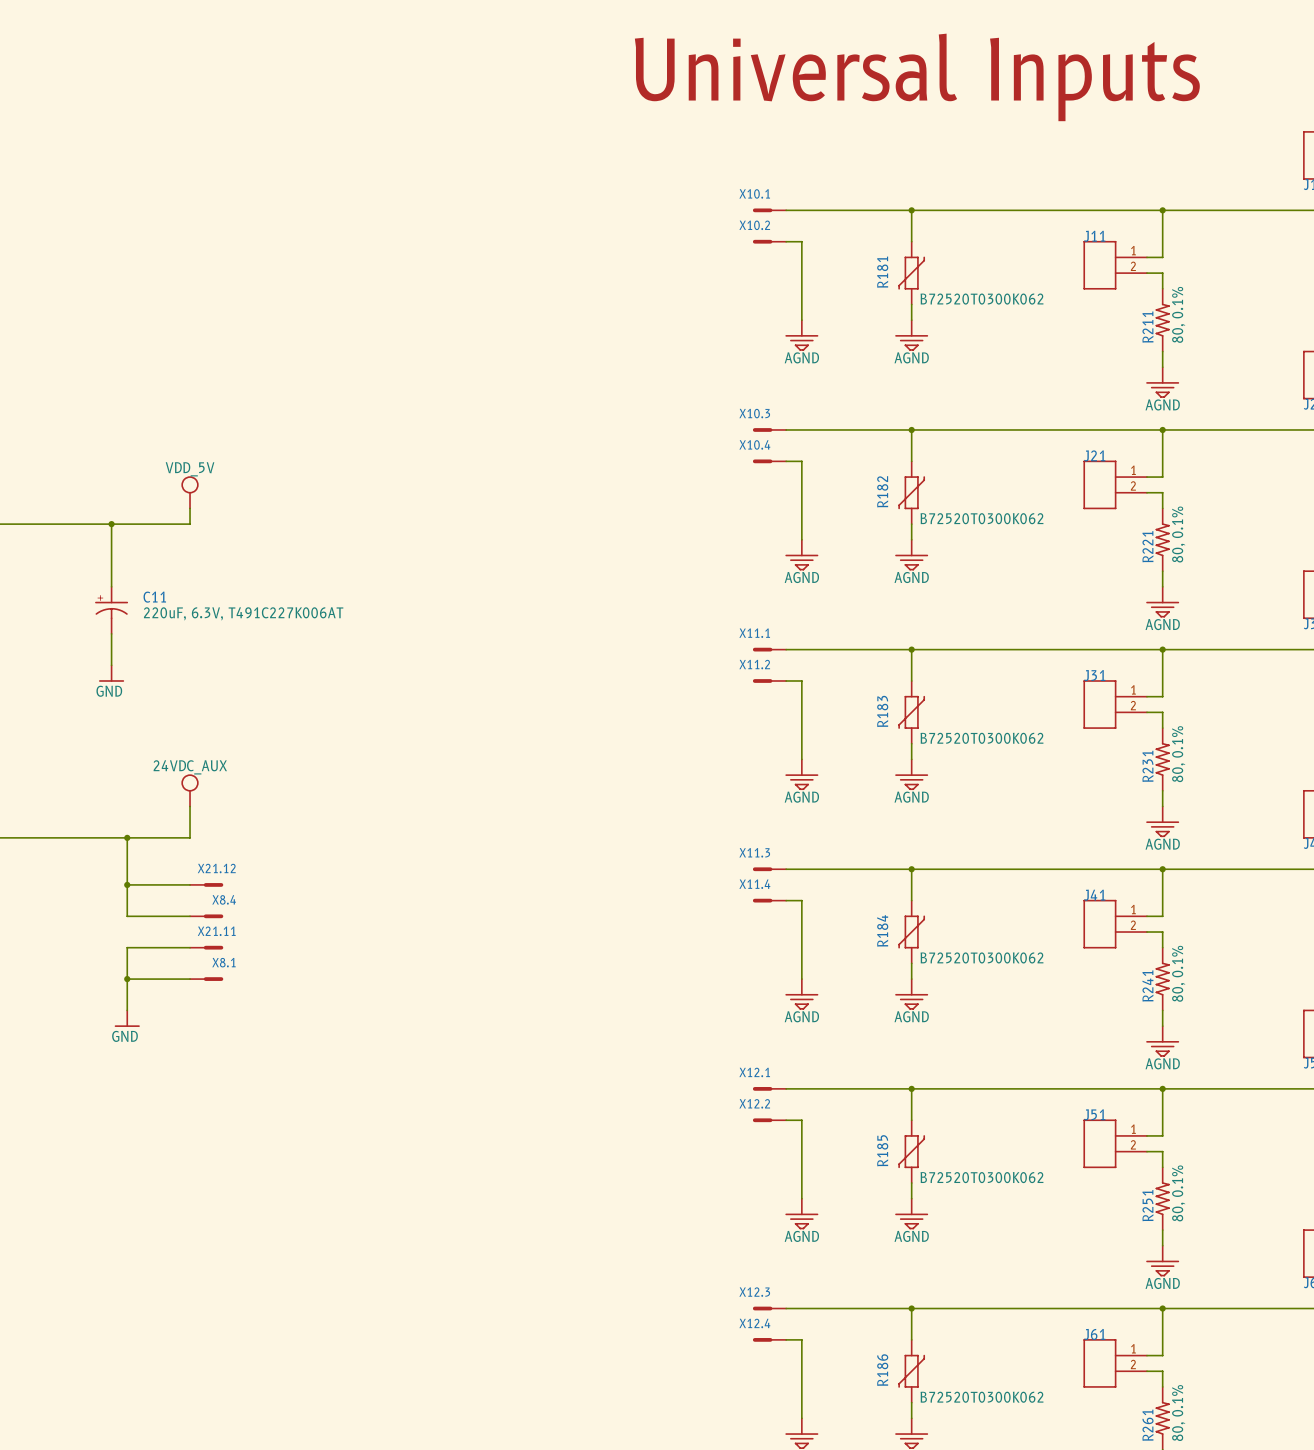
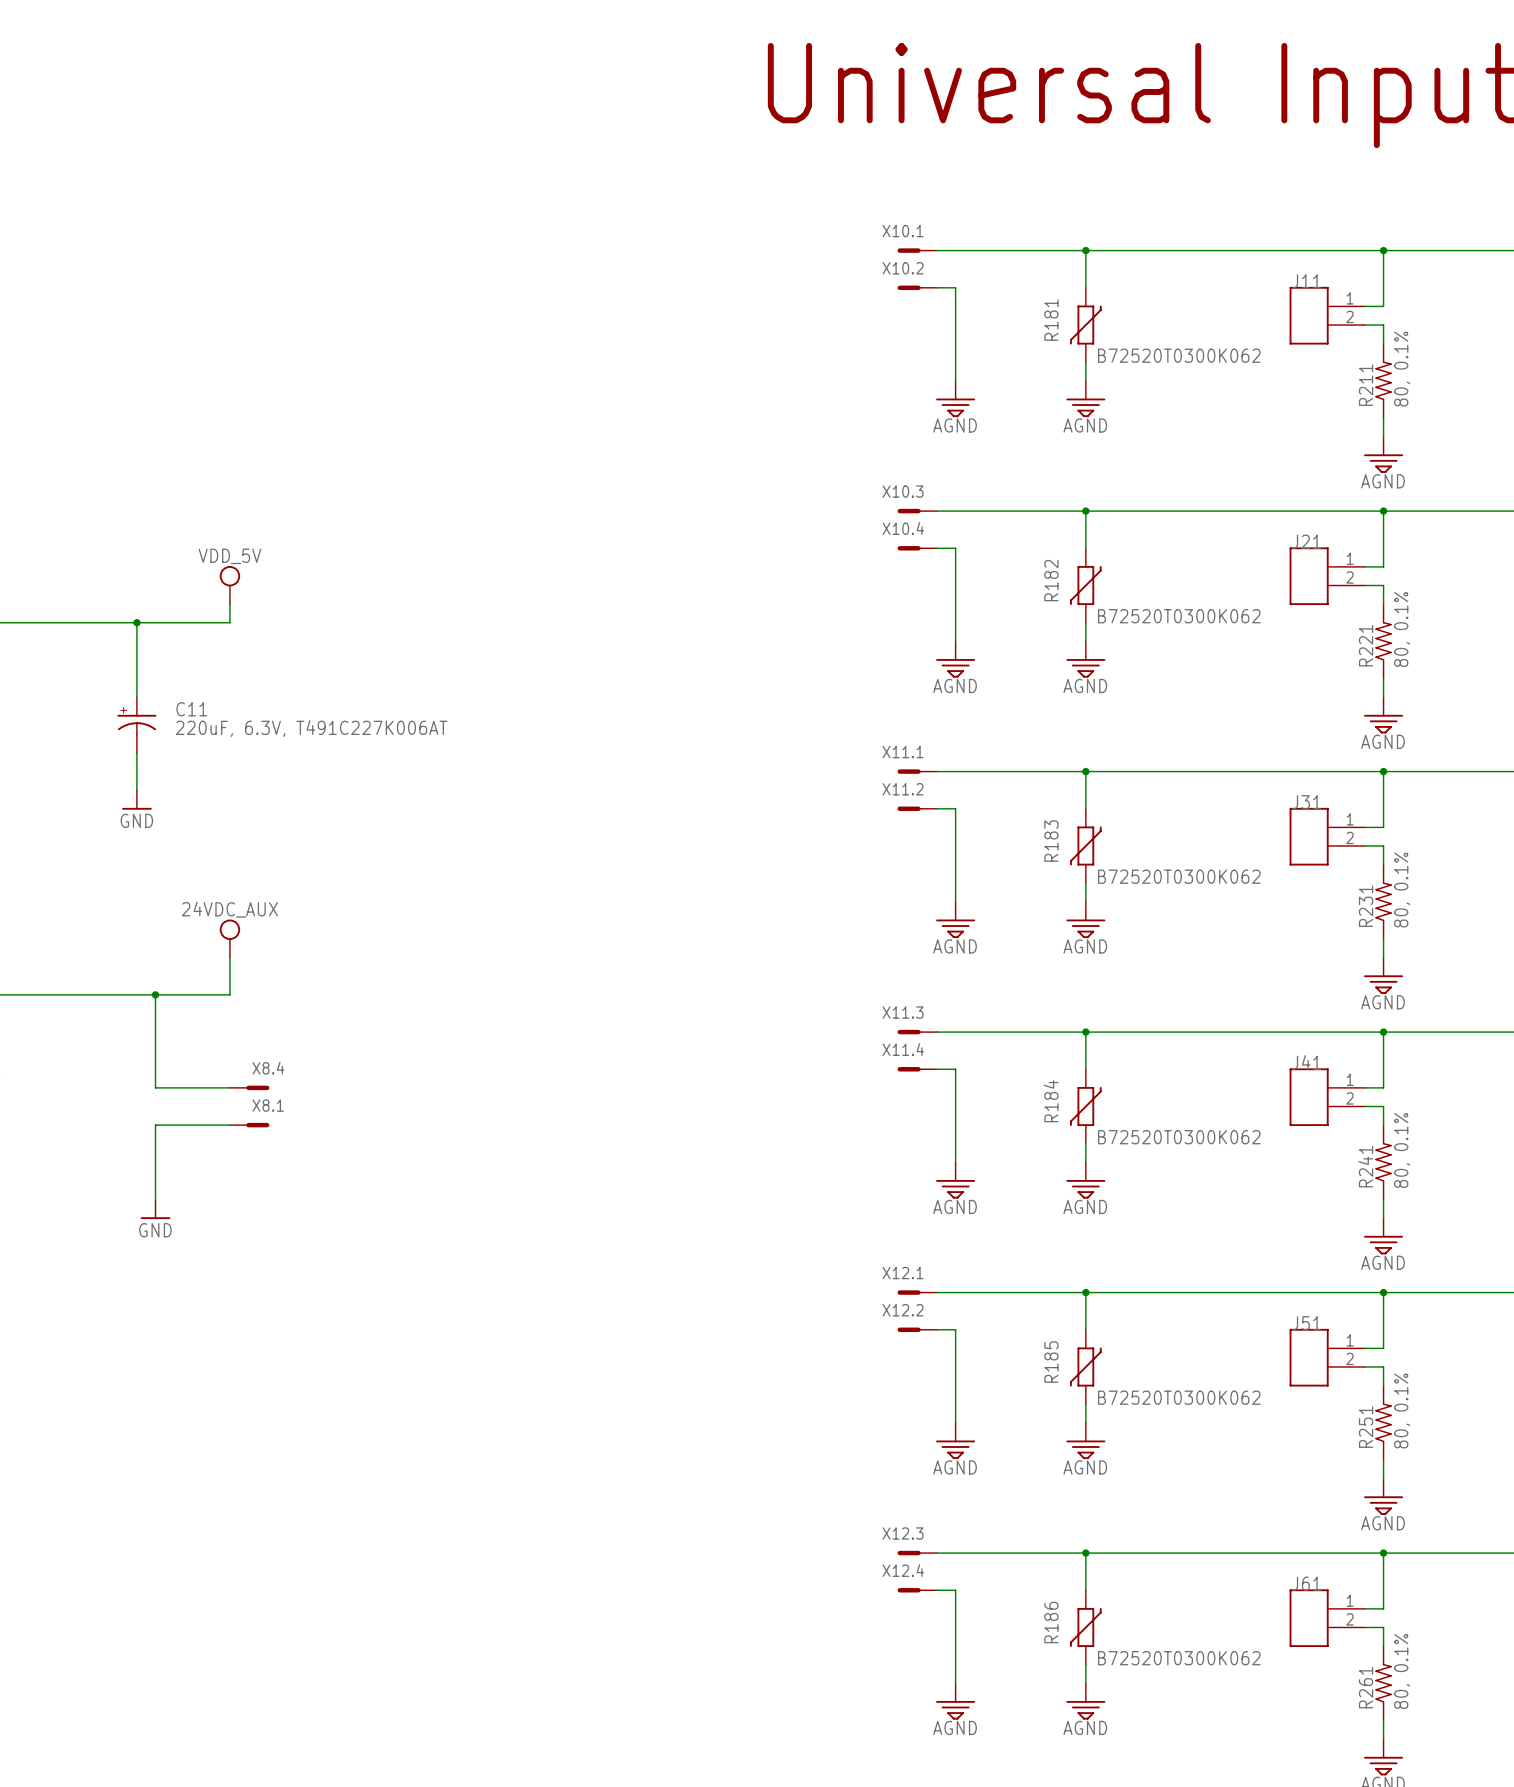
wire: (127, 884) (190, 884) -> none
junction: (127, 884) -> none
X21.12: (206, 884) -> none
X21.11 name: X21.11 (216, 931) -> X8.1 (268, 1105)
wire: (127, 979) (190, 979) -> none
junction: (127, 979) -> none
X8.1: (206, 979) -> none

